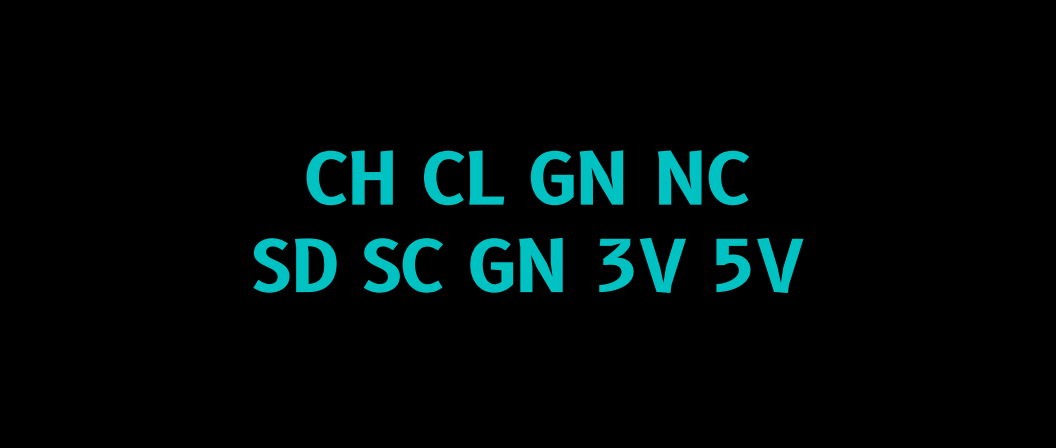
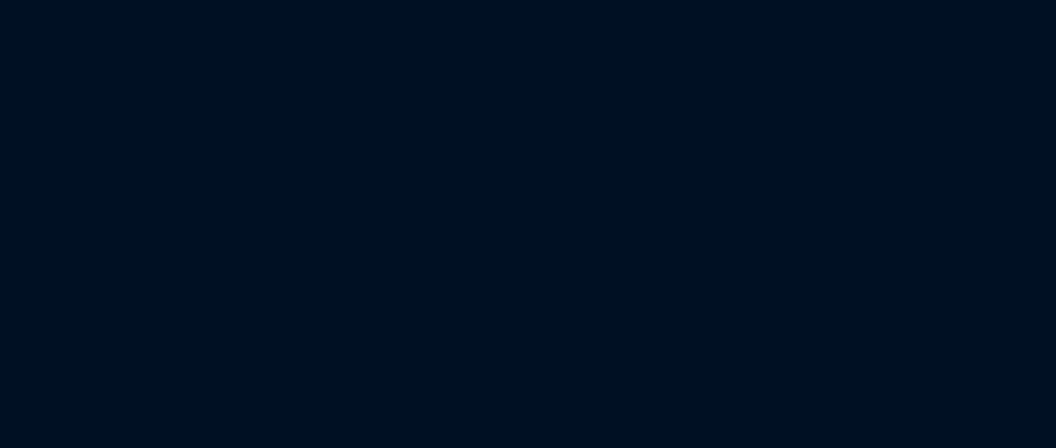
text: CH CL GN NC (527, 177) -> none
text: SD SC GN 3V 5V (528, 265) -> none

